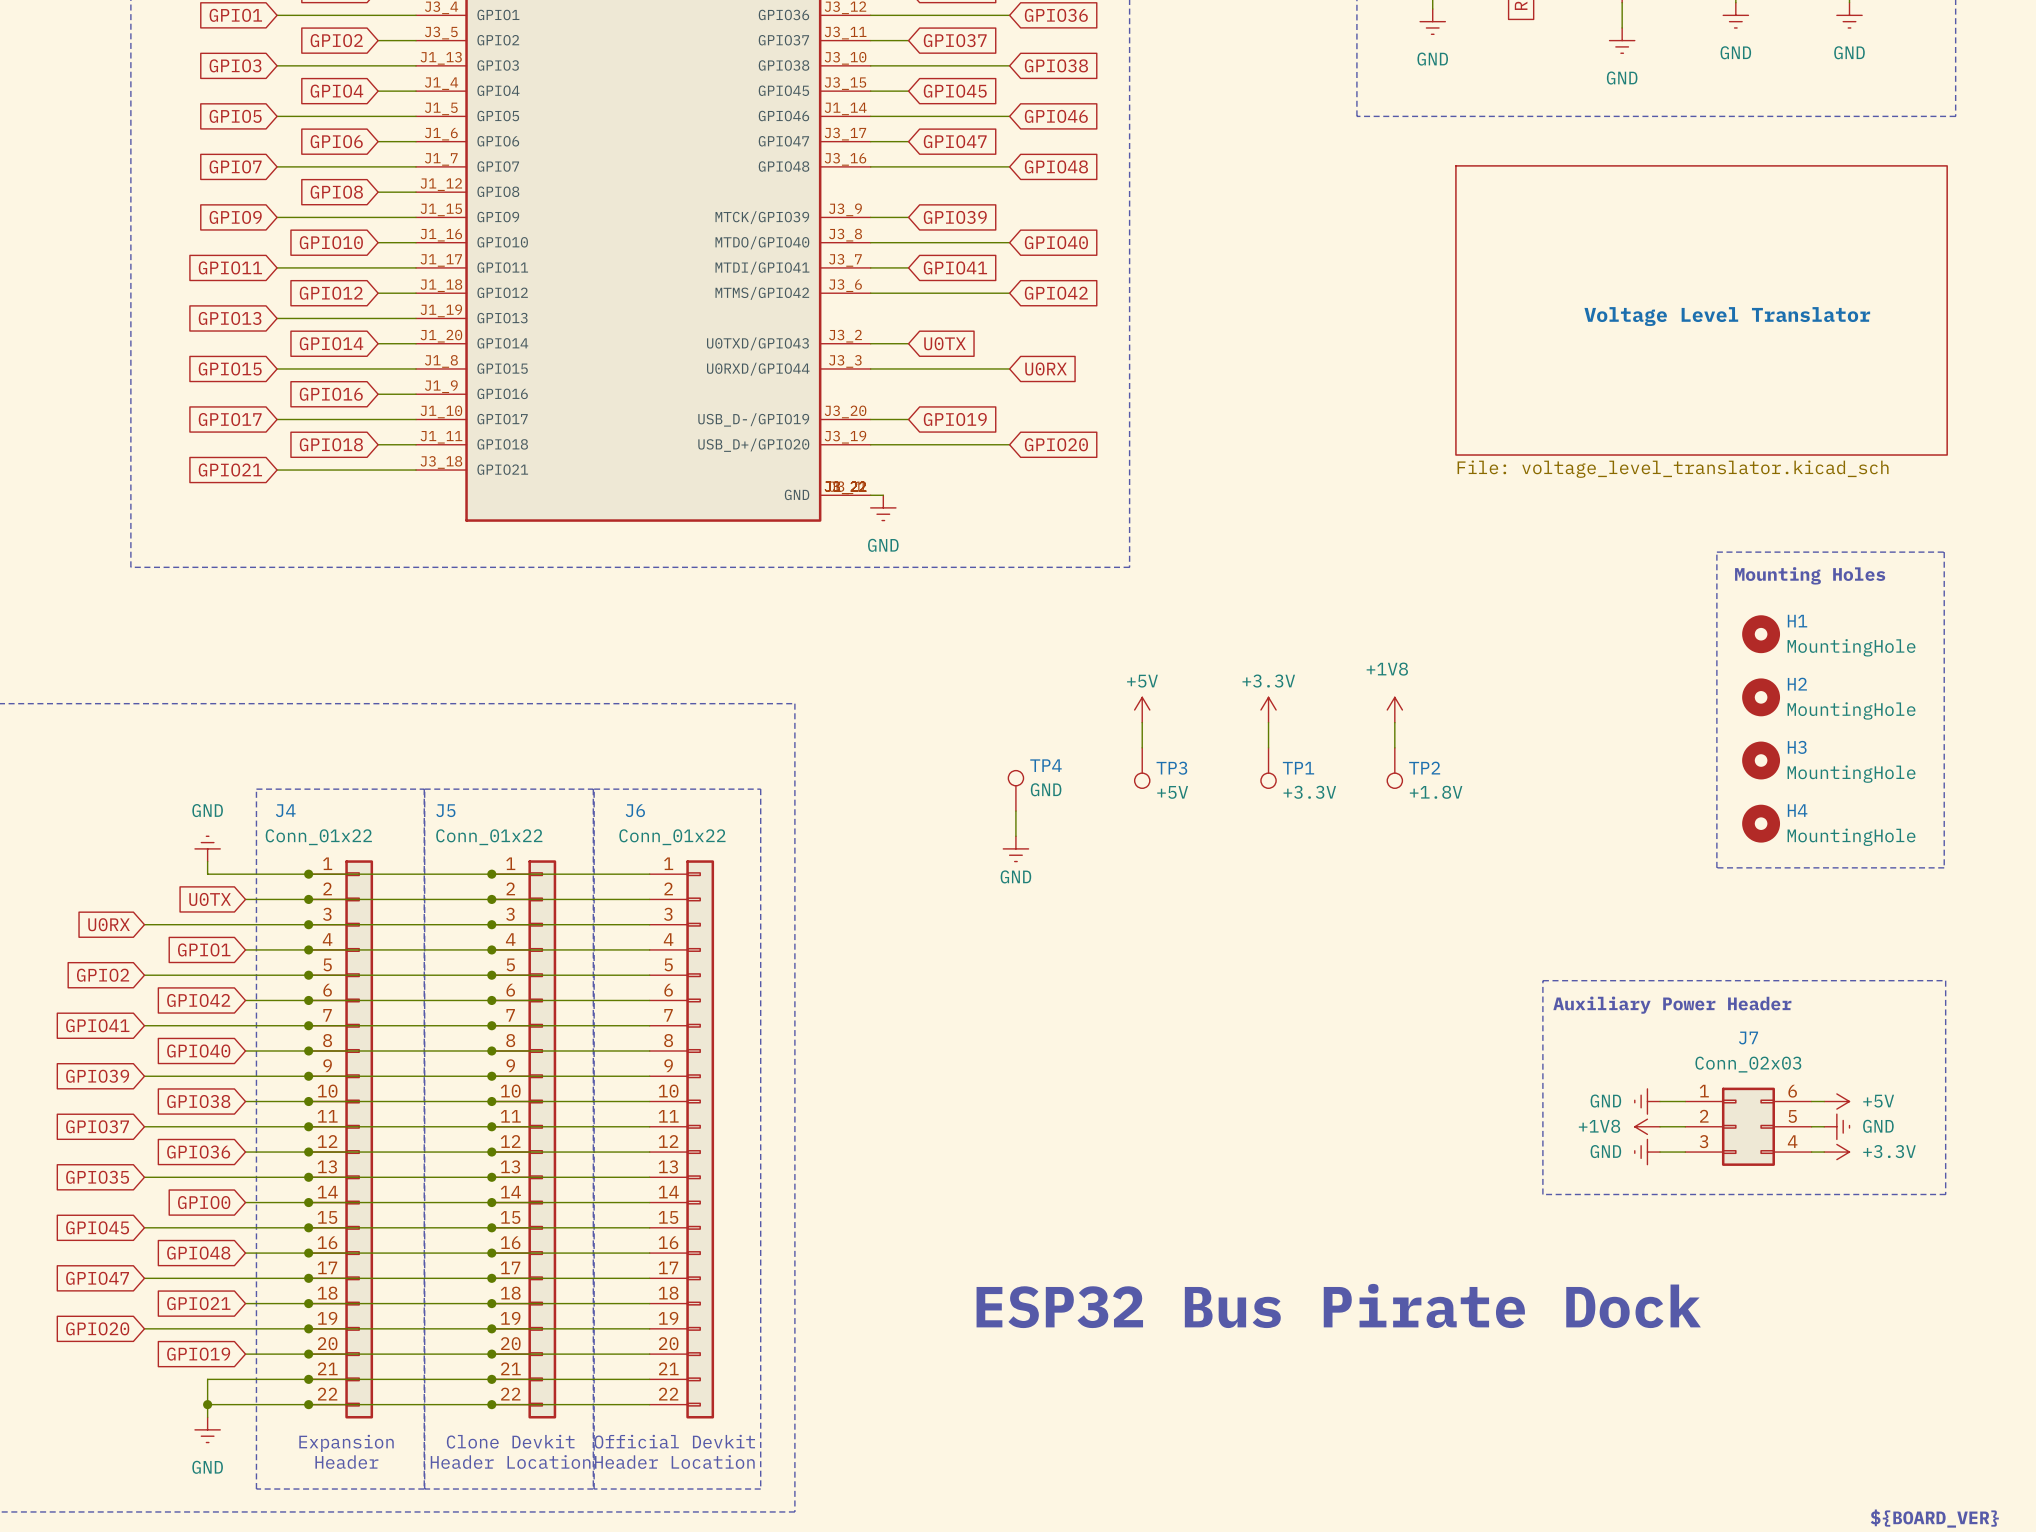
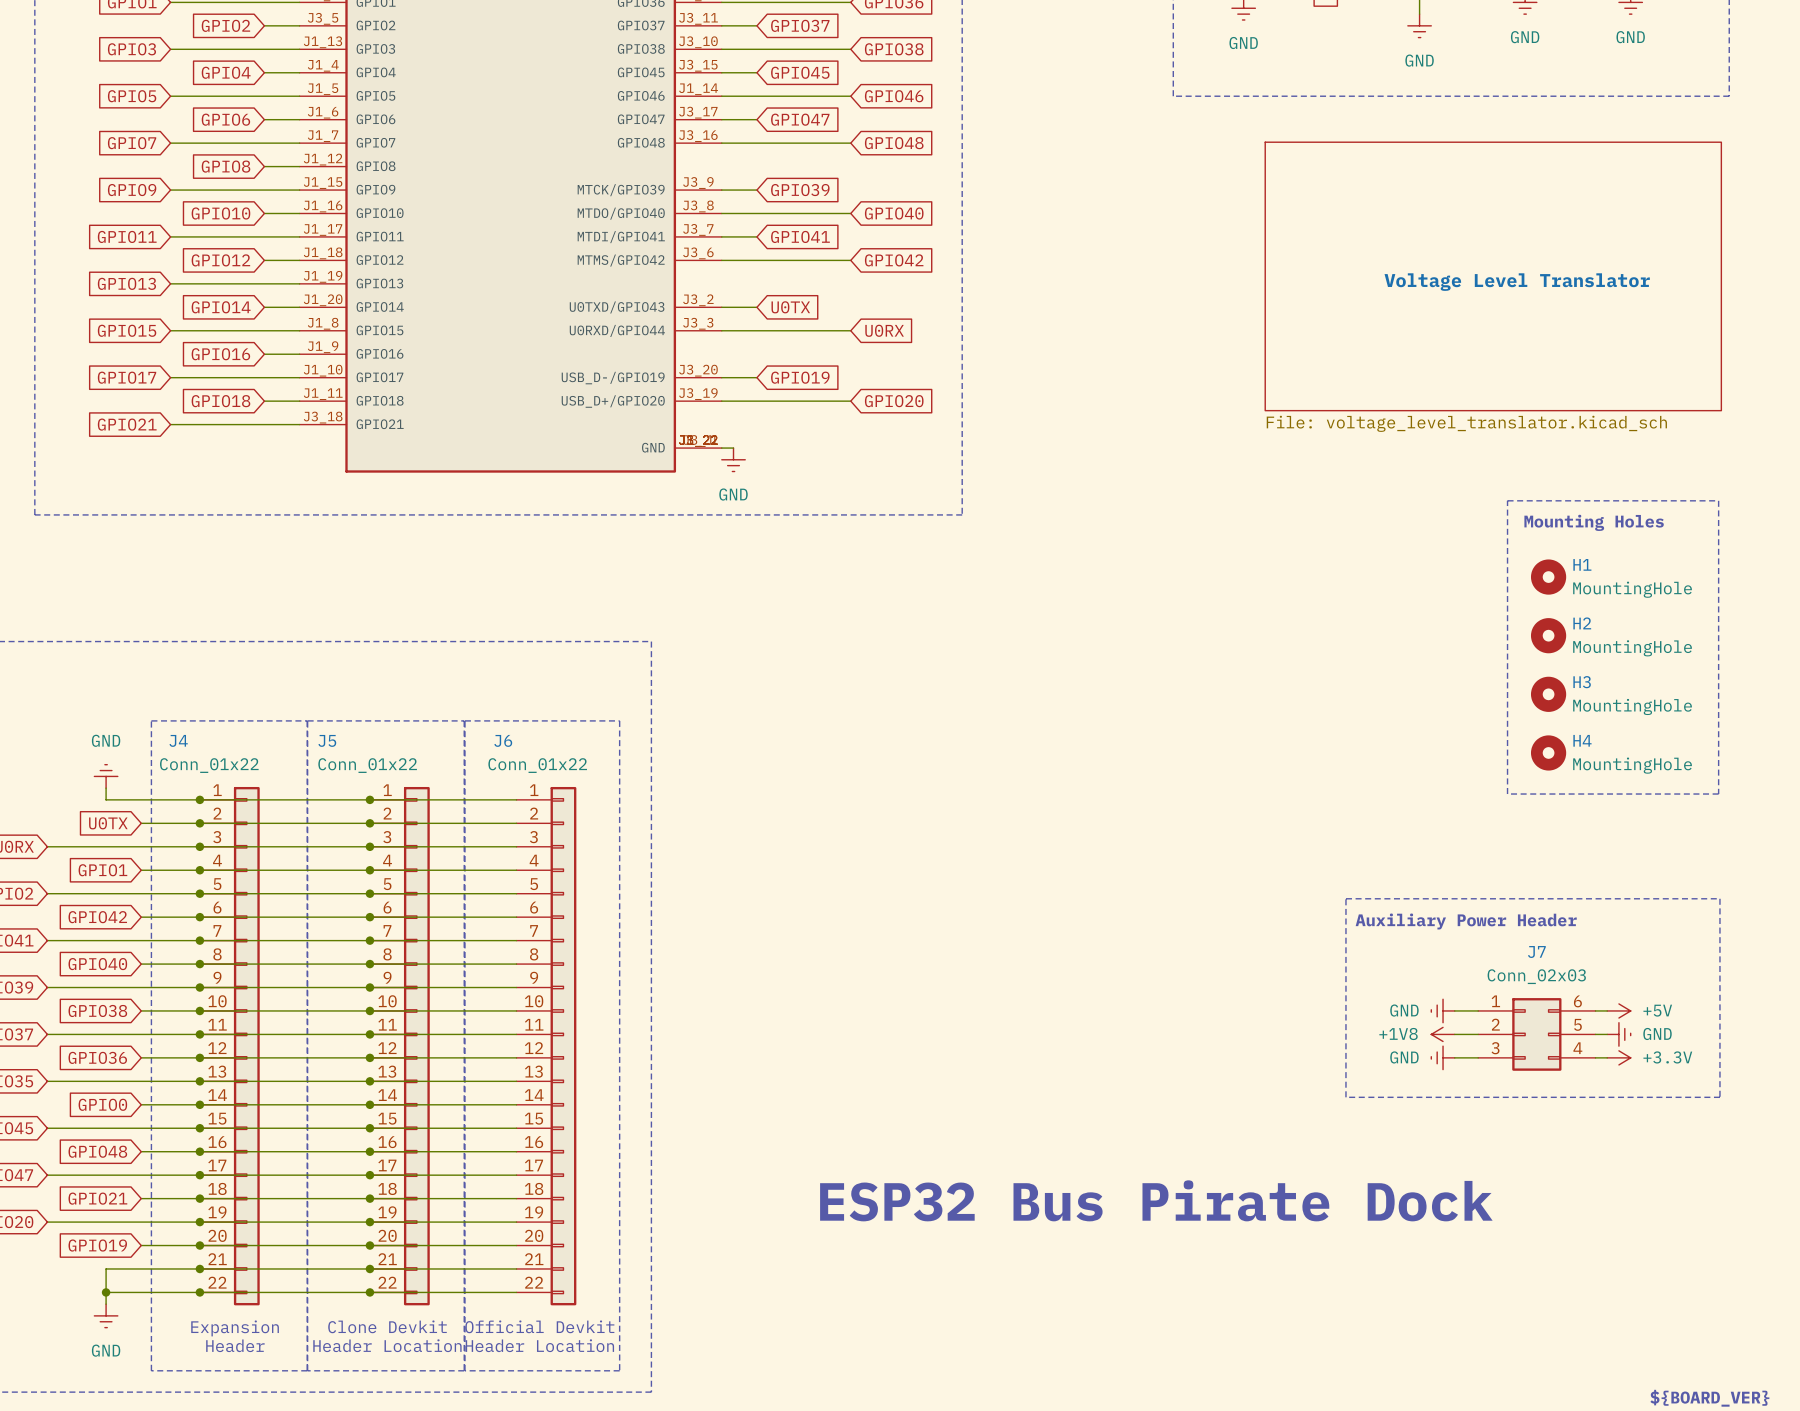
power symbol: +5V (1142, 709) -> none
power symbol: +3.3V (1268, 709) -> none
power symbol: +1V8 (1394, 709) -> none
wire: (1142, 722) (1142, 747) -> none
wire: (1268, 722) (1268, 747) -> none
wire: (1394, 722) (1394, 747) -> none
TP3: +5V (1142, 768) -> none
TP1: +3.3V (1268, 768) -> none
TP2: +1.8V (1394, 768) -> none
TP4: GND (1015, 790) -> none
wire: (1015, 811) (1015, 836) -> none
power symbol: GND (1015, 848) -> none

